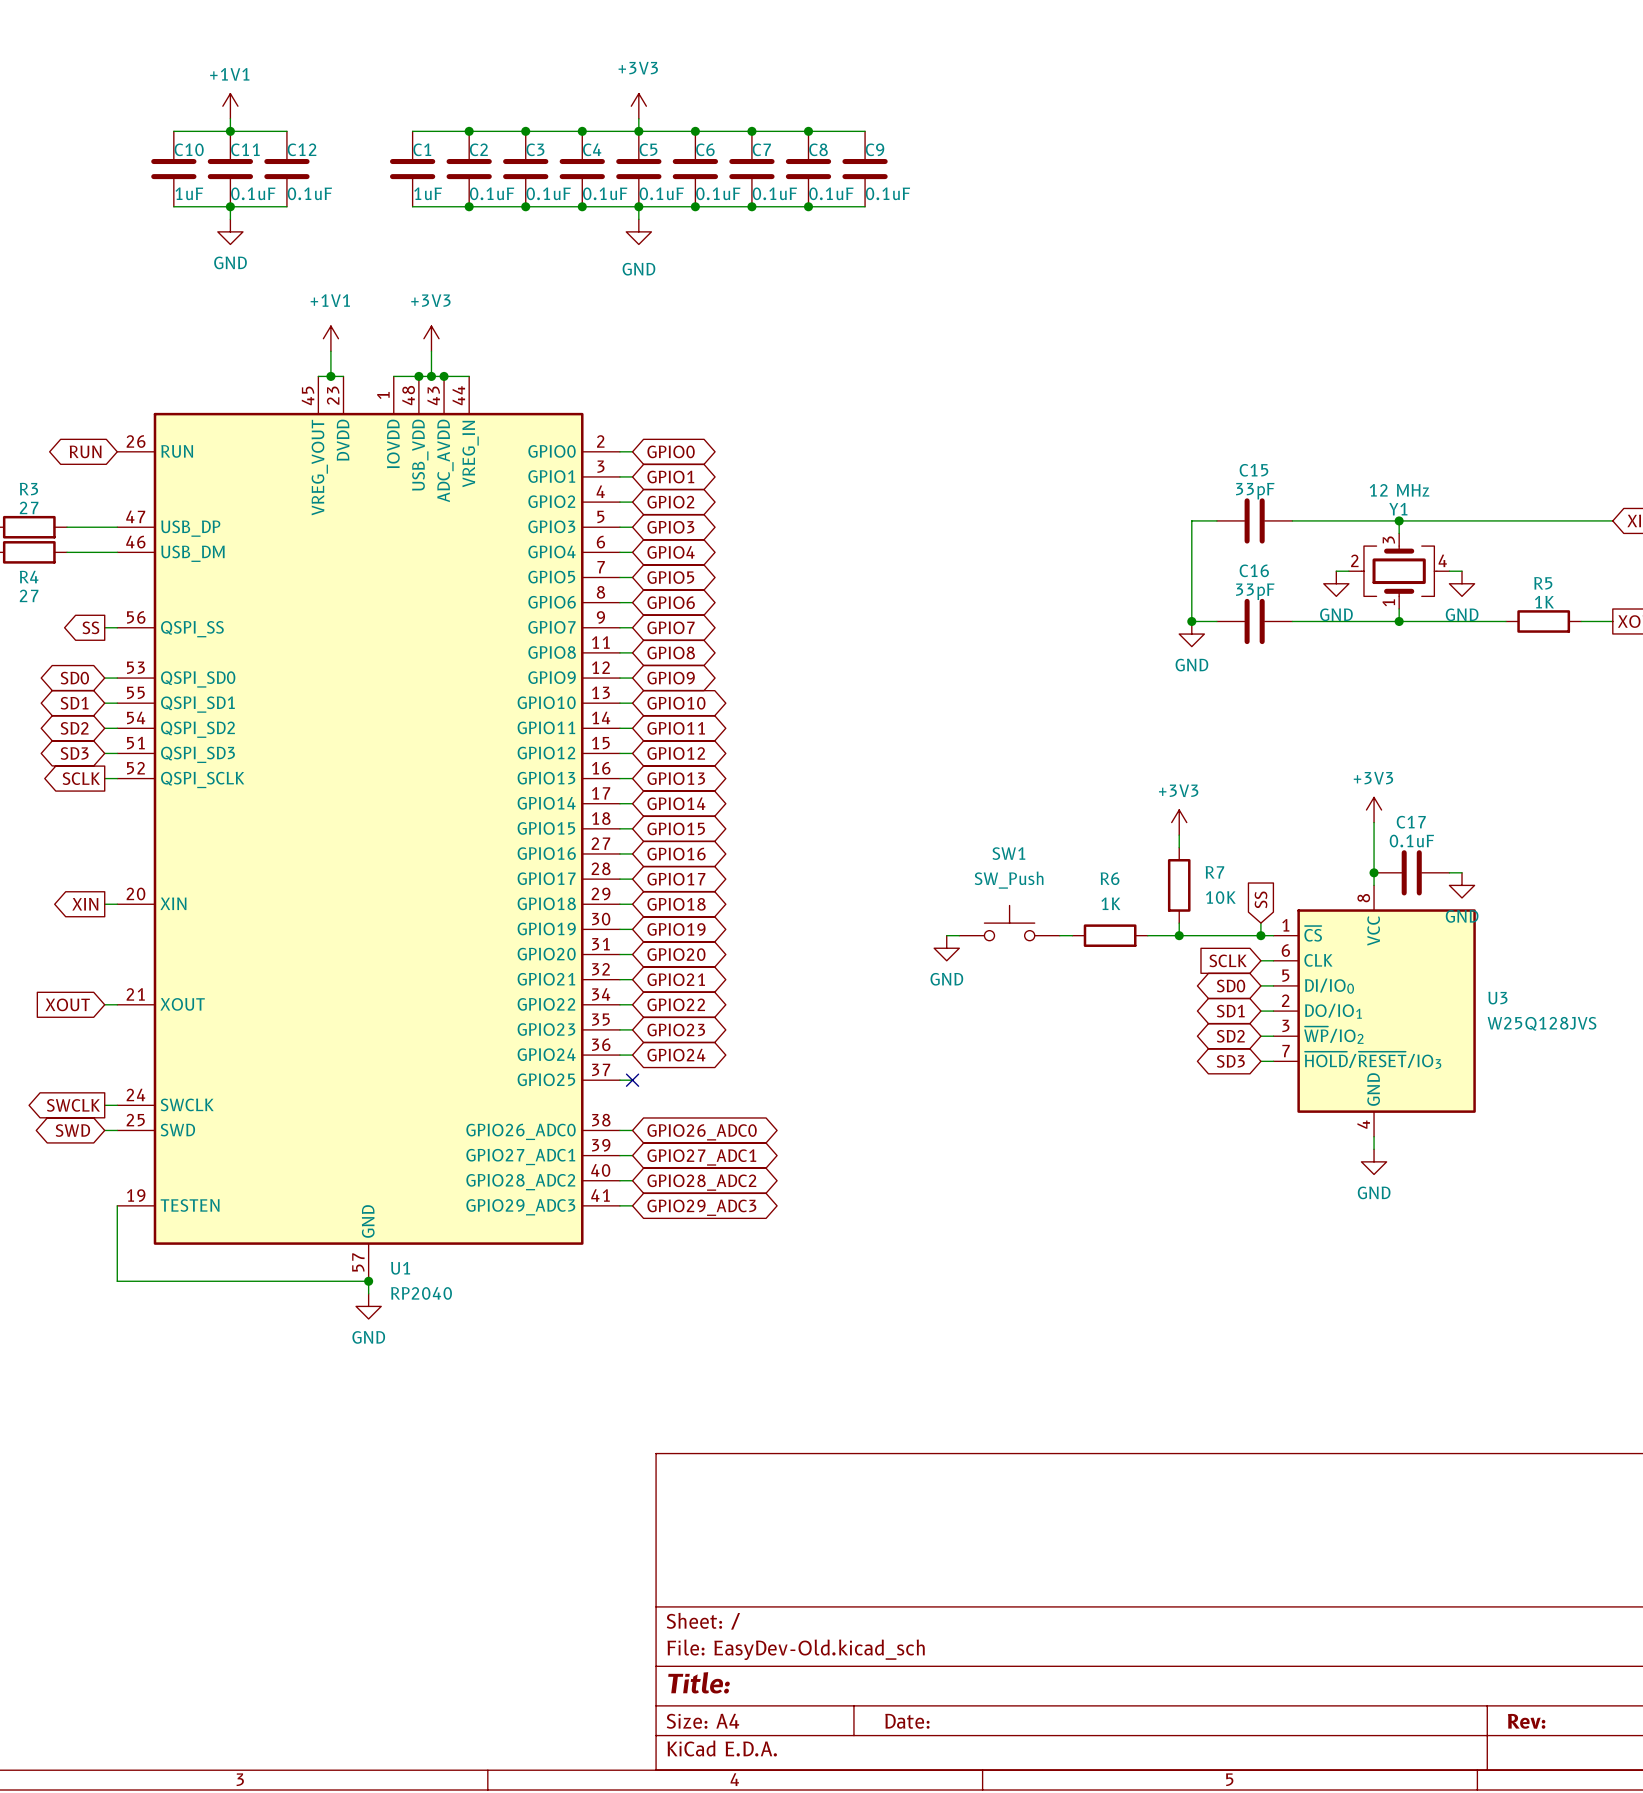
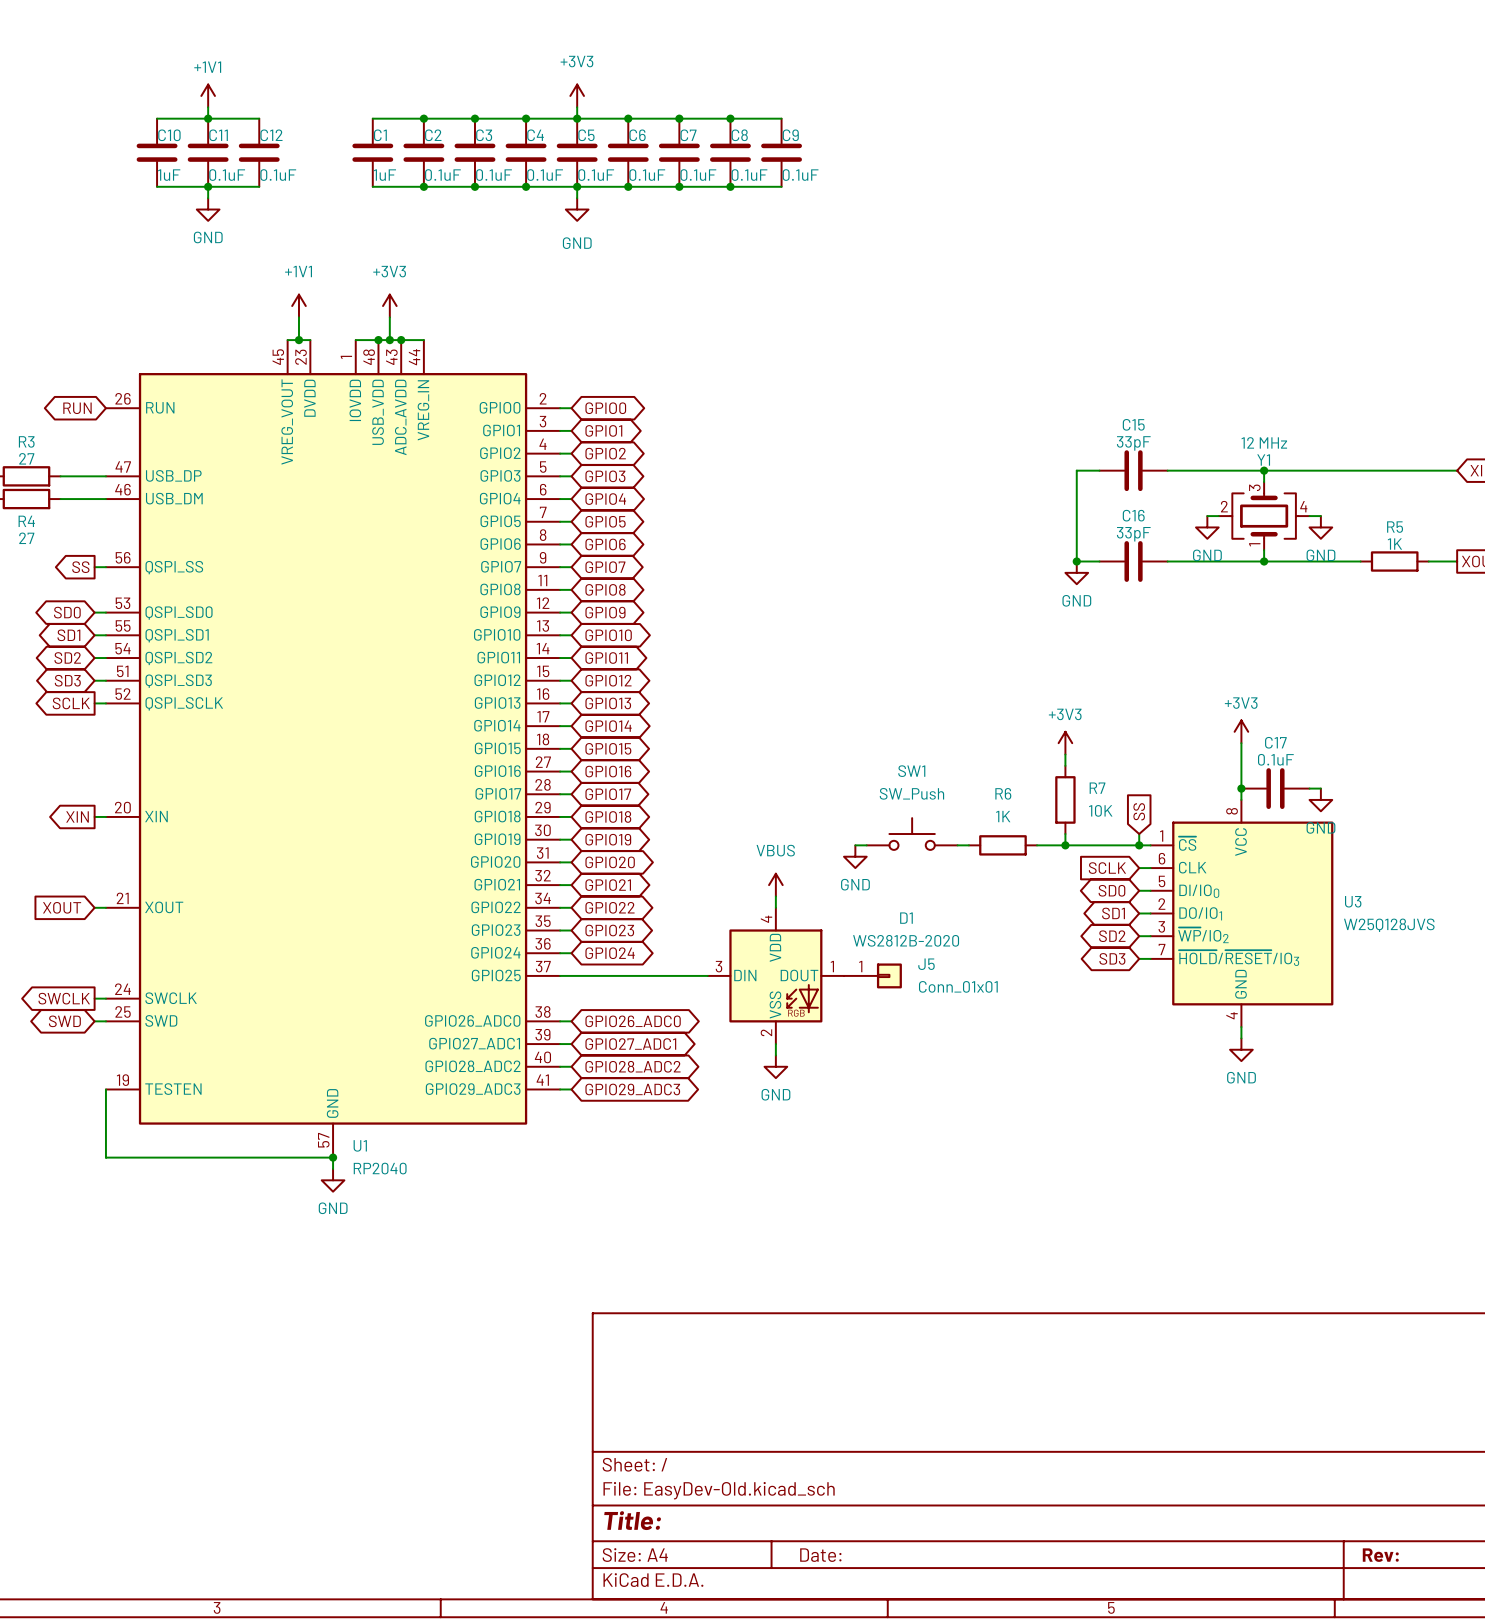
power symbol: none -> VBUS (775, 885)
wire: none -> (775, 896) (775, 907)
wire: none -> (571, 975) (707, 975)
no-connect mark: (632, 1080) -> none
D1: none -> WS2812B-2020 (775, 975)
J5: none -> Conn_01x01 (872, 975)
wire: none -> (775, 1044) (775, 1055)
power symbol: none -> GND (775, 1066)

